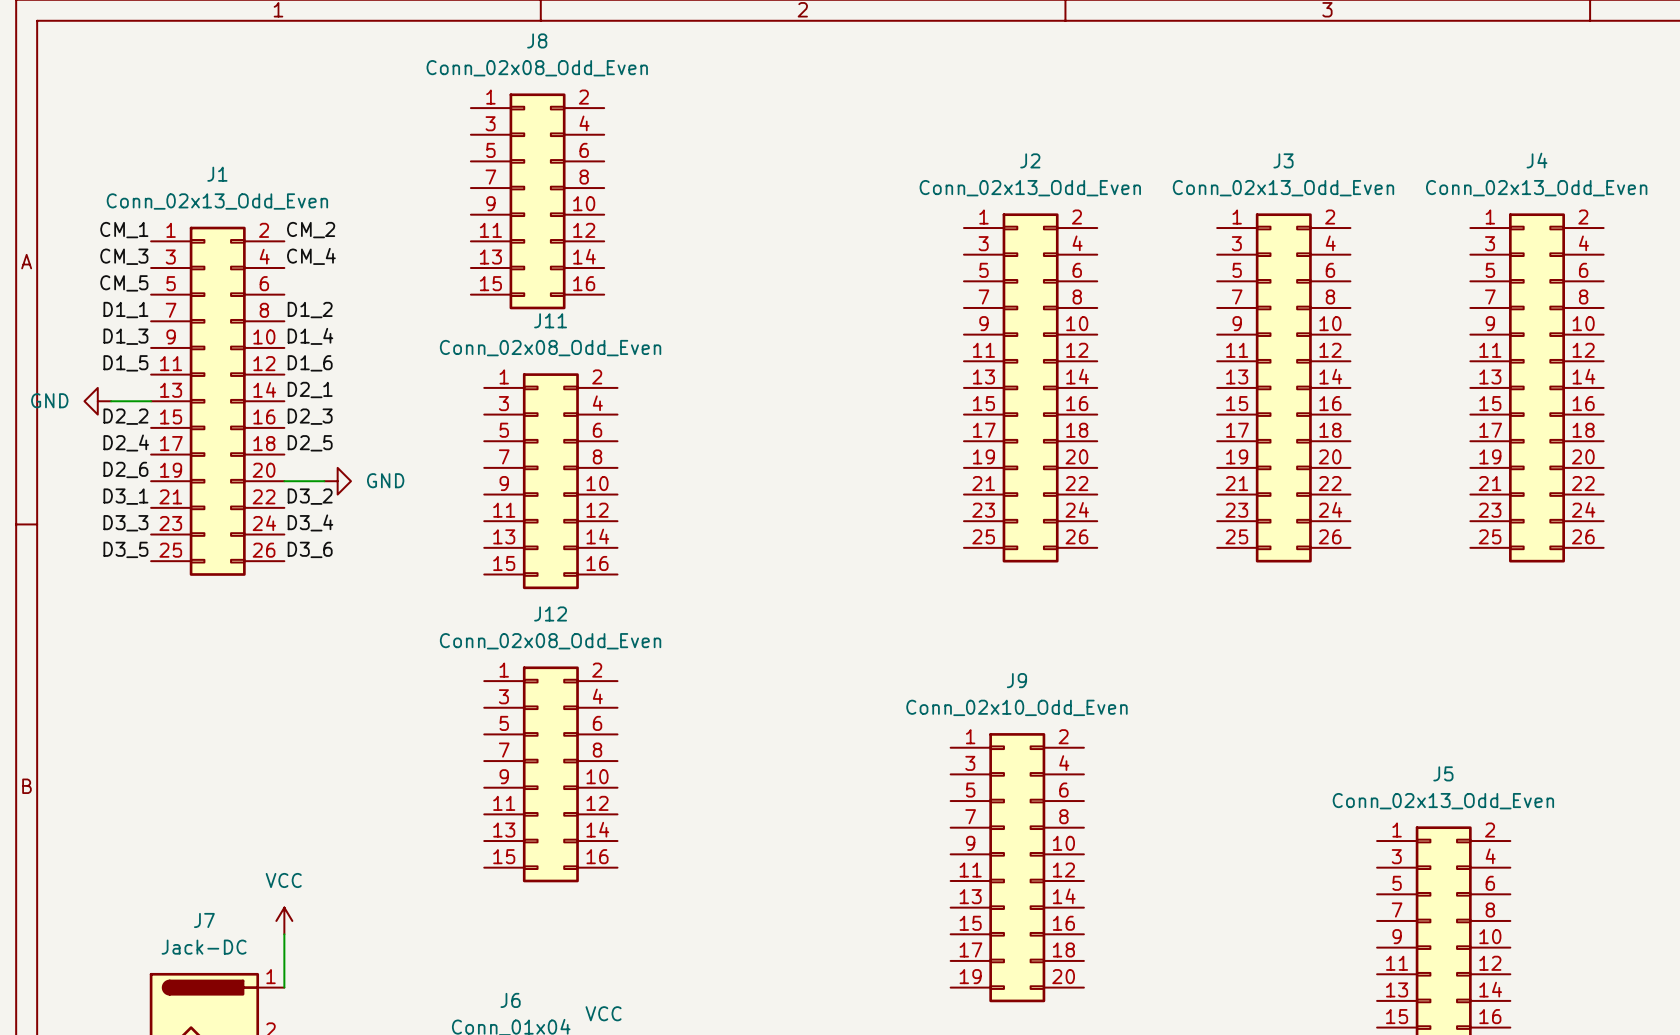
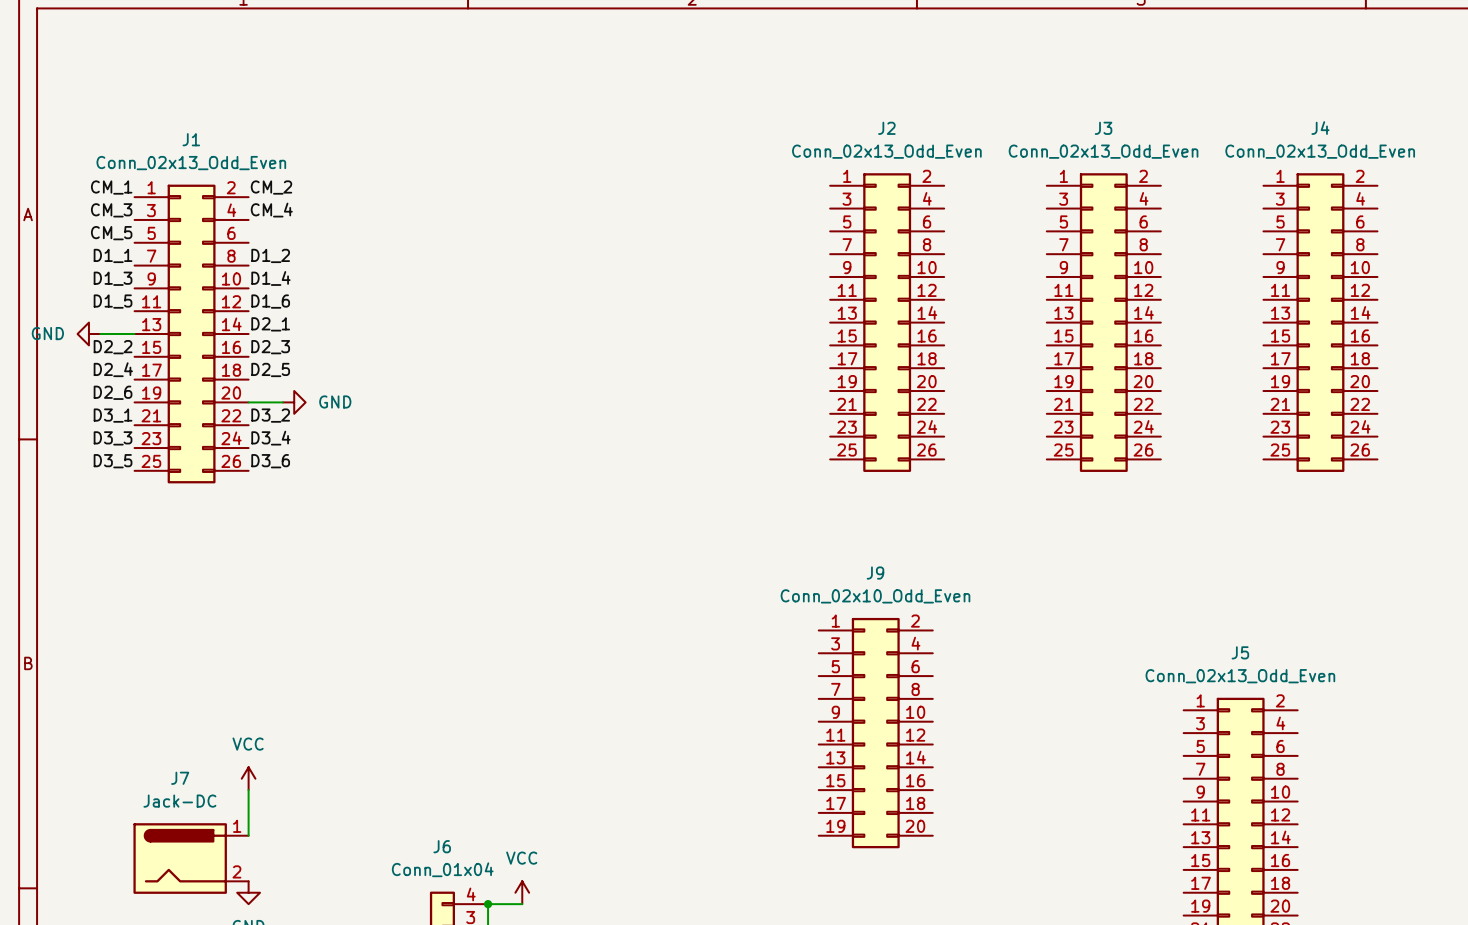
J8: Conn_02x08_Odd_Even (537, 201) -> none
J11: Conn_02x08_Odd_Even (550, 481) -> none
J12: Conn_02x08_Odd_Even (550, 774) -> none

